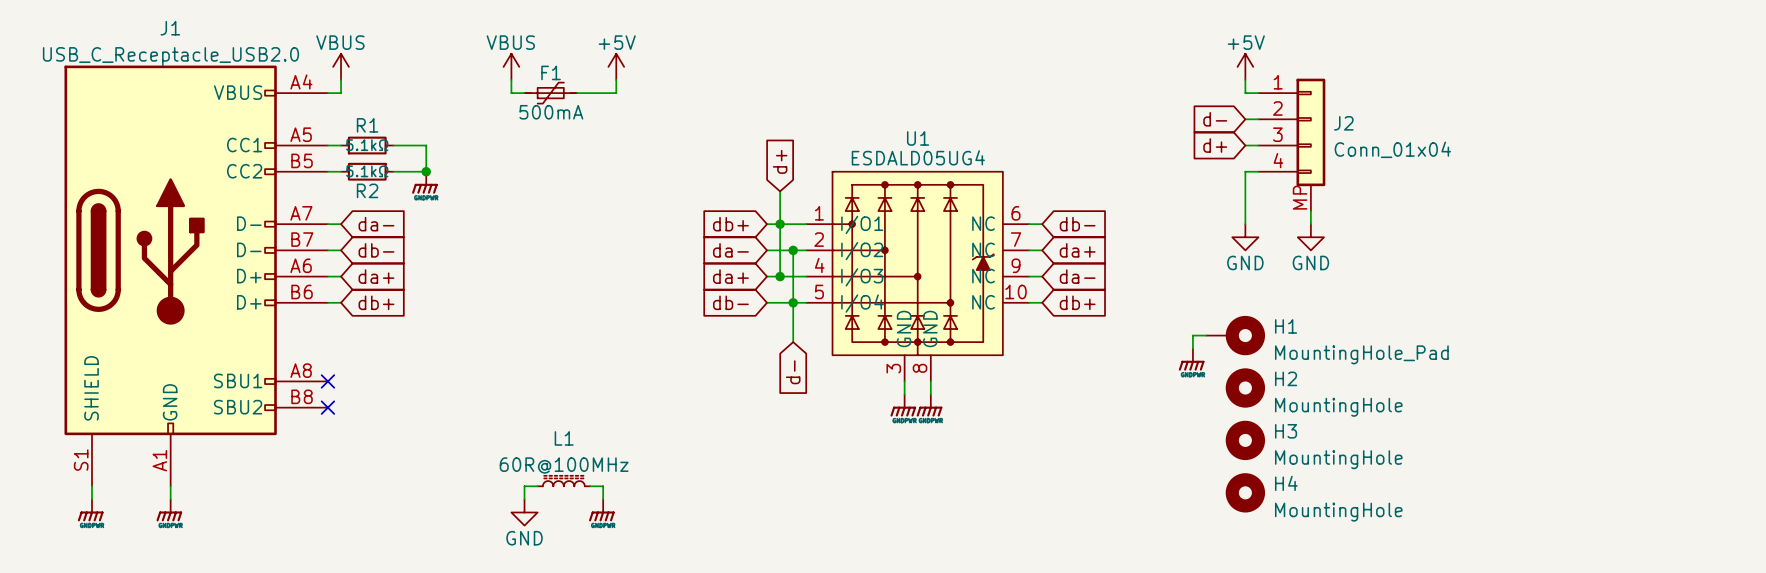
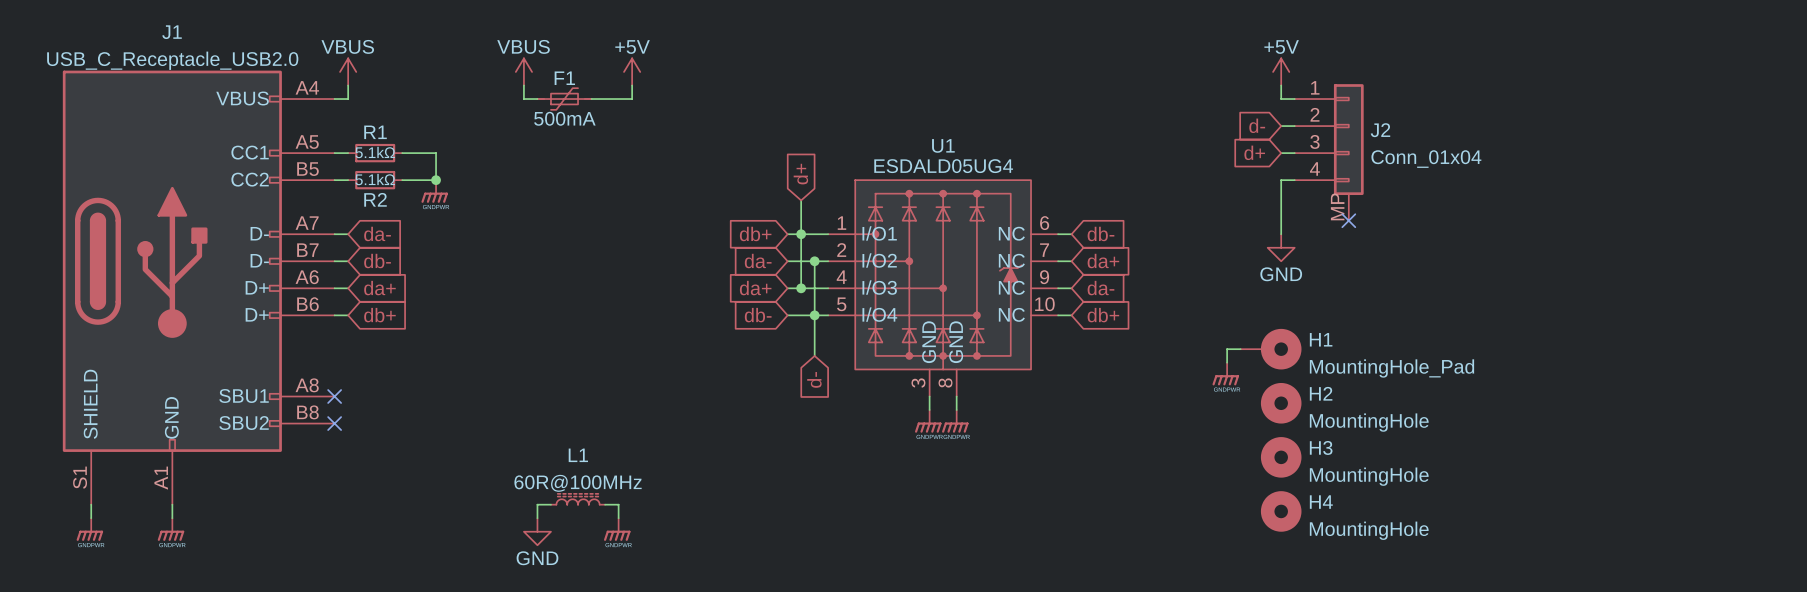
wire: (1310, 211) (1310, 224) -> none
no-connect mark: none -> (1348, 220)
power symbol: GND (1310, 237) -> none

